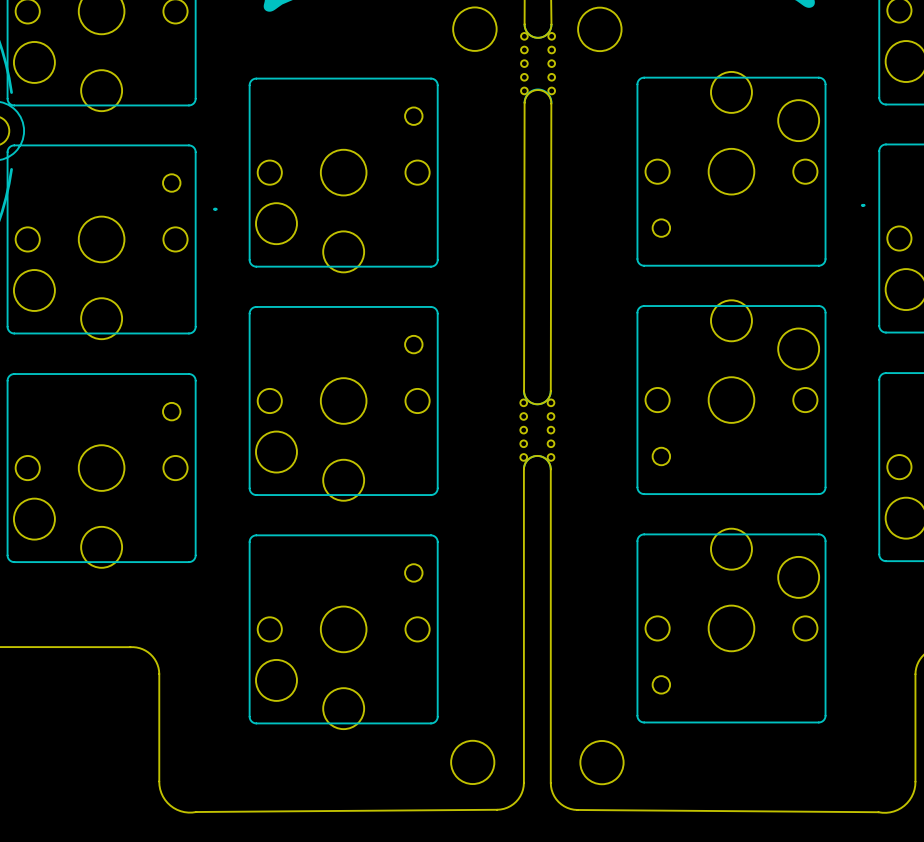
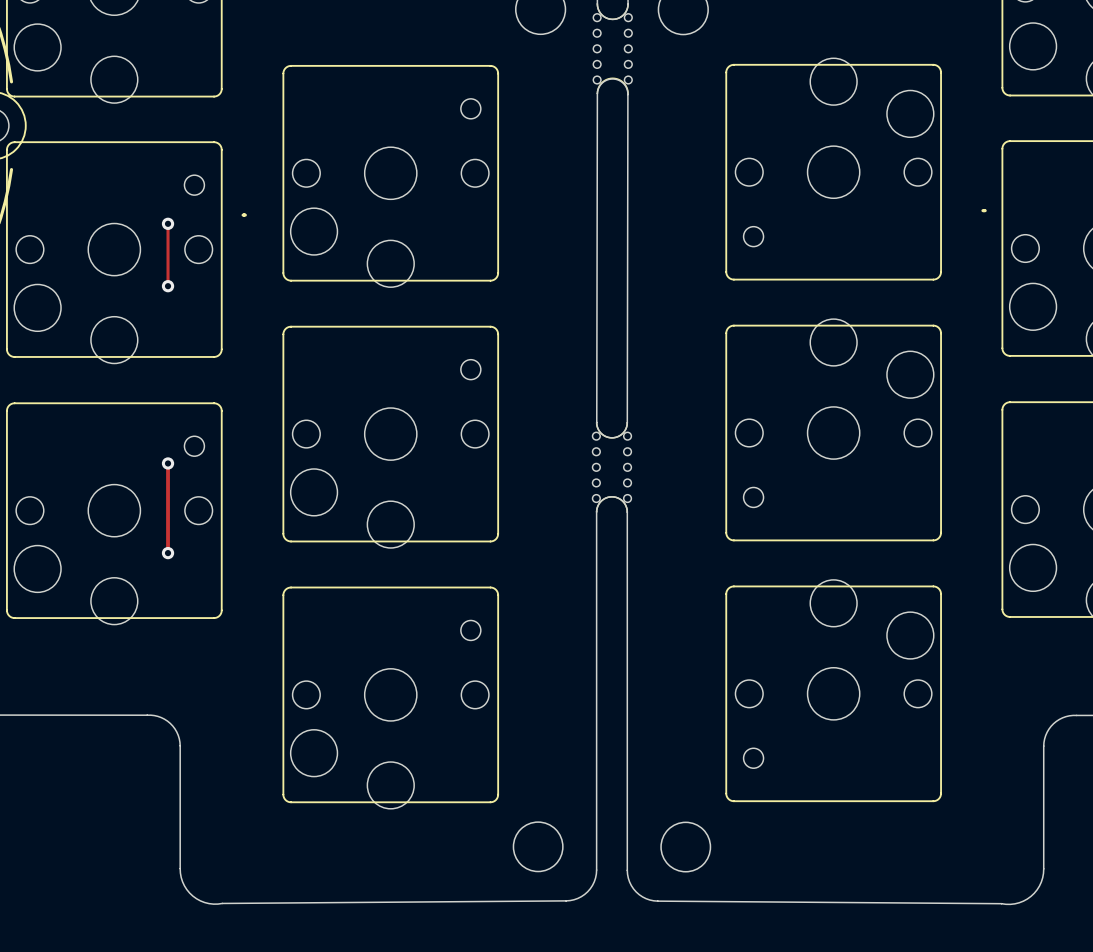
track: none -> (168, 223) (168, 288)
via: none -> (168, 223)
via: none -> (168, 286)
track: none -> (168, 463) (168, 553)
via: none -> (168, 463)
via: none -> (168, 553)

